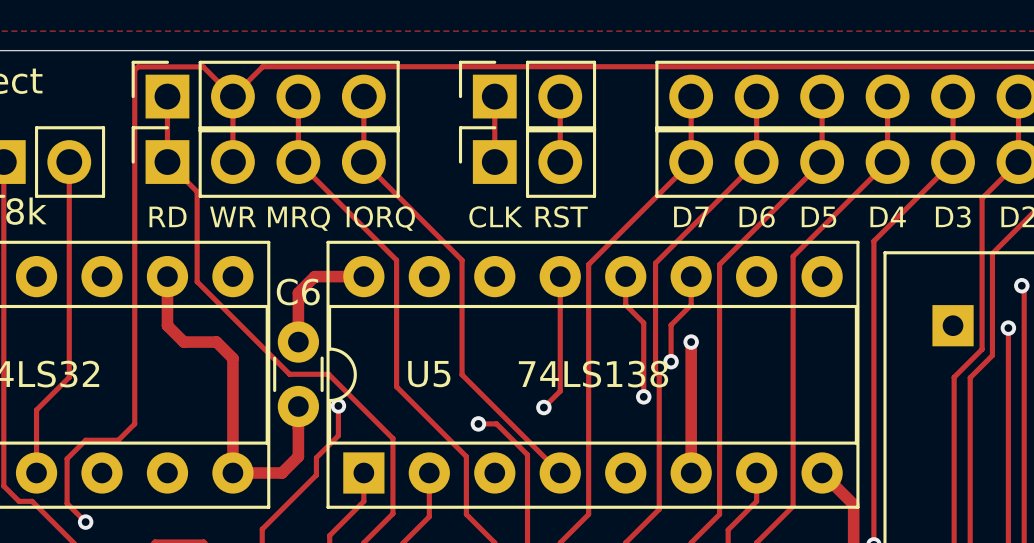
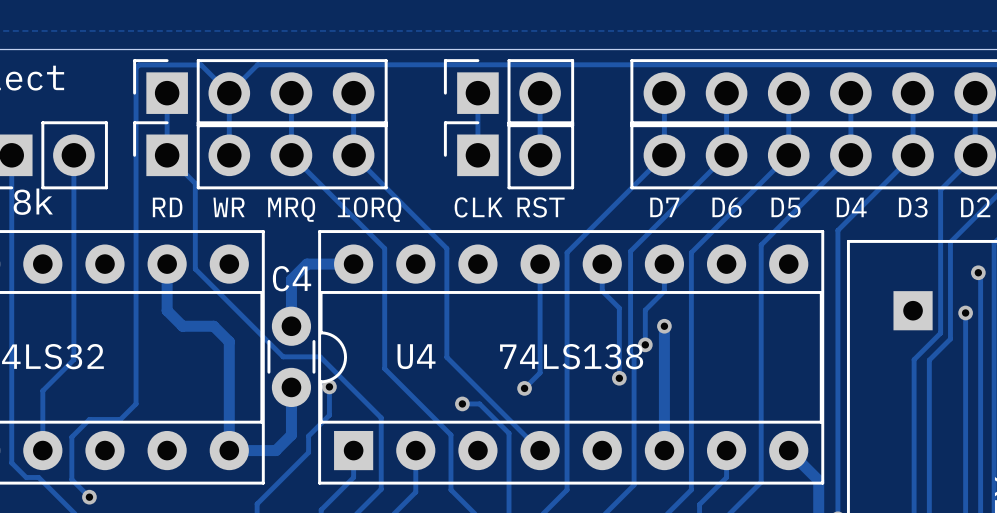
C6 name: C6 (298, 292) -> C4 (292, 278)
U5 name: U5 (429, 374) -> U4 (416, 356)

